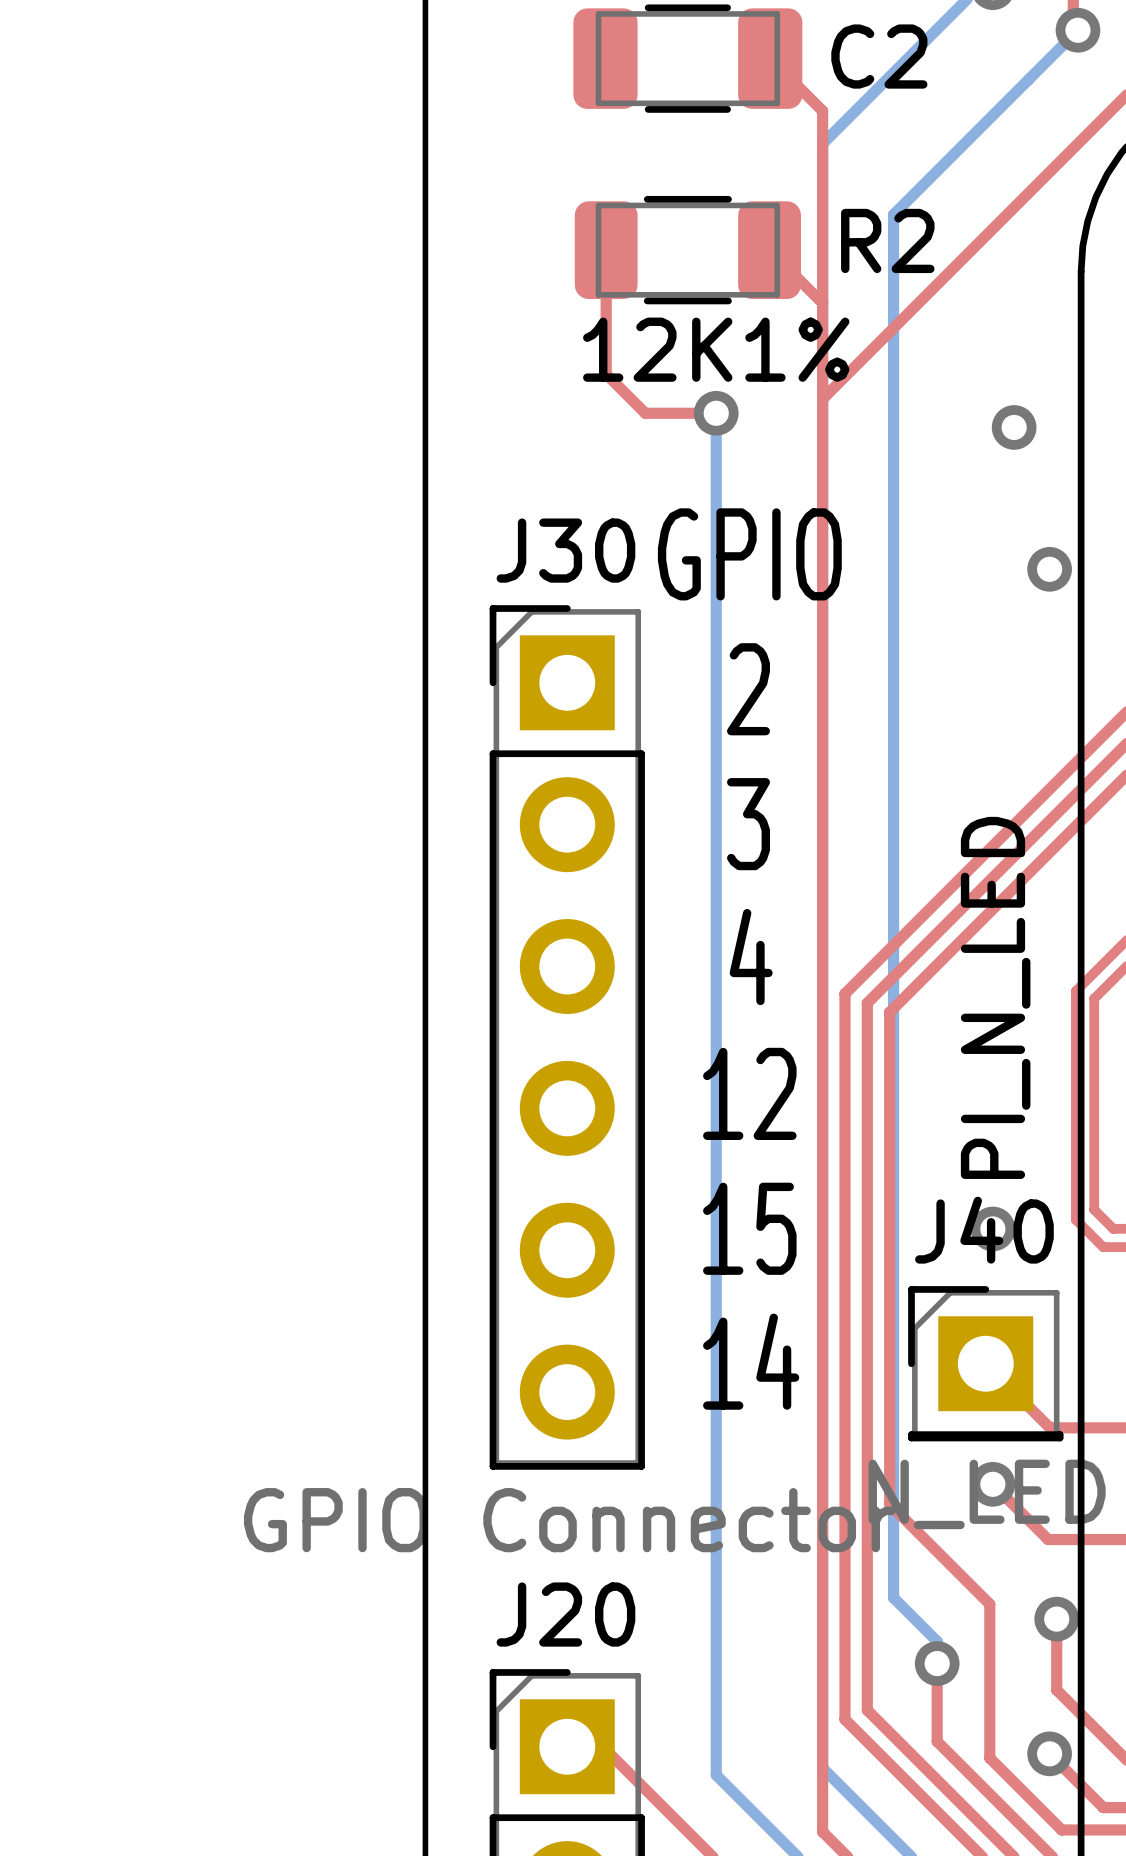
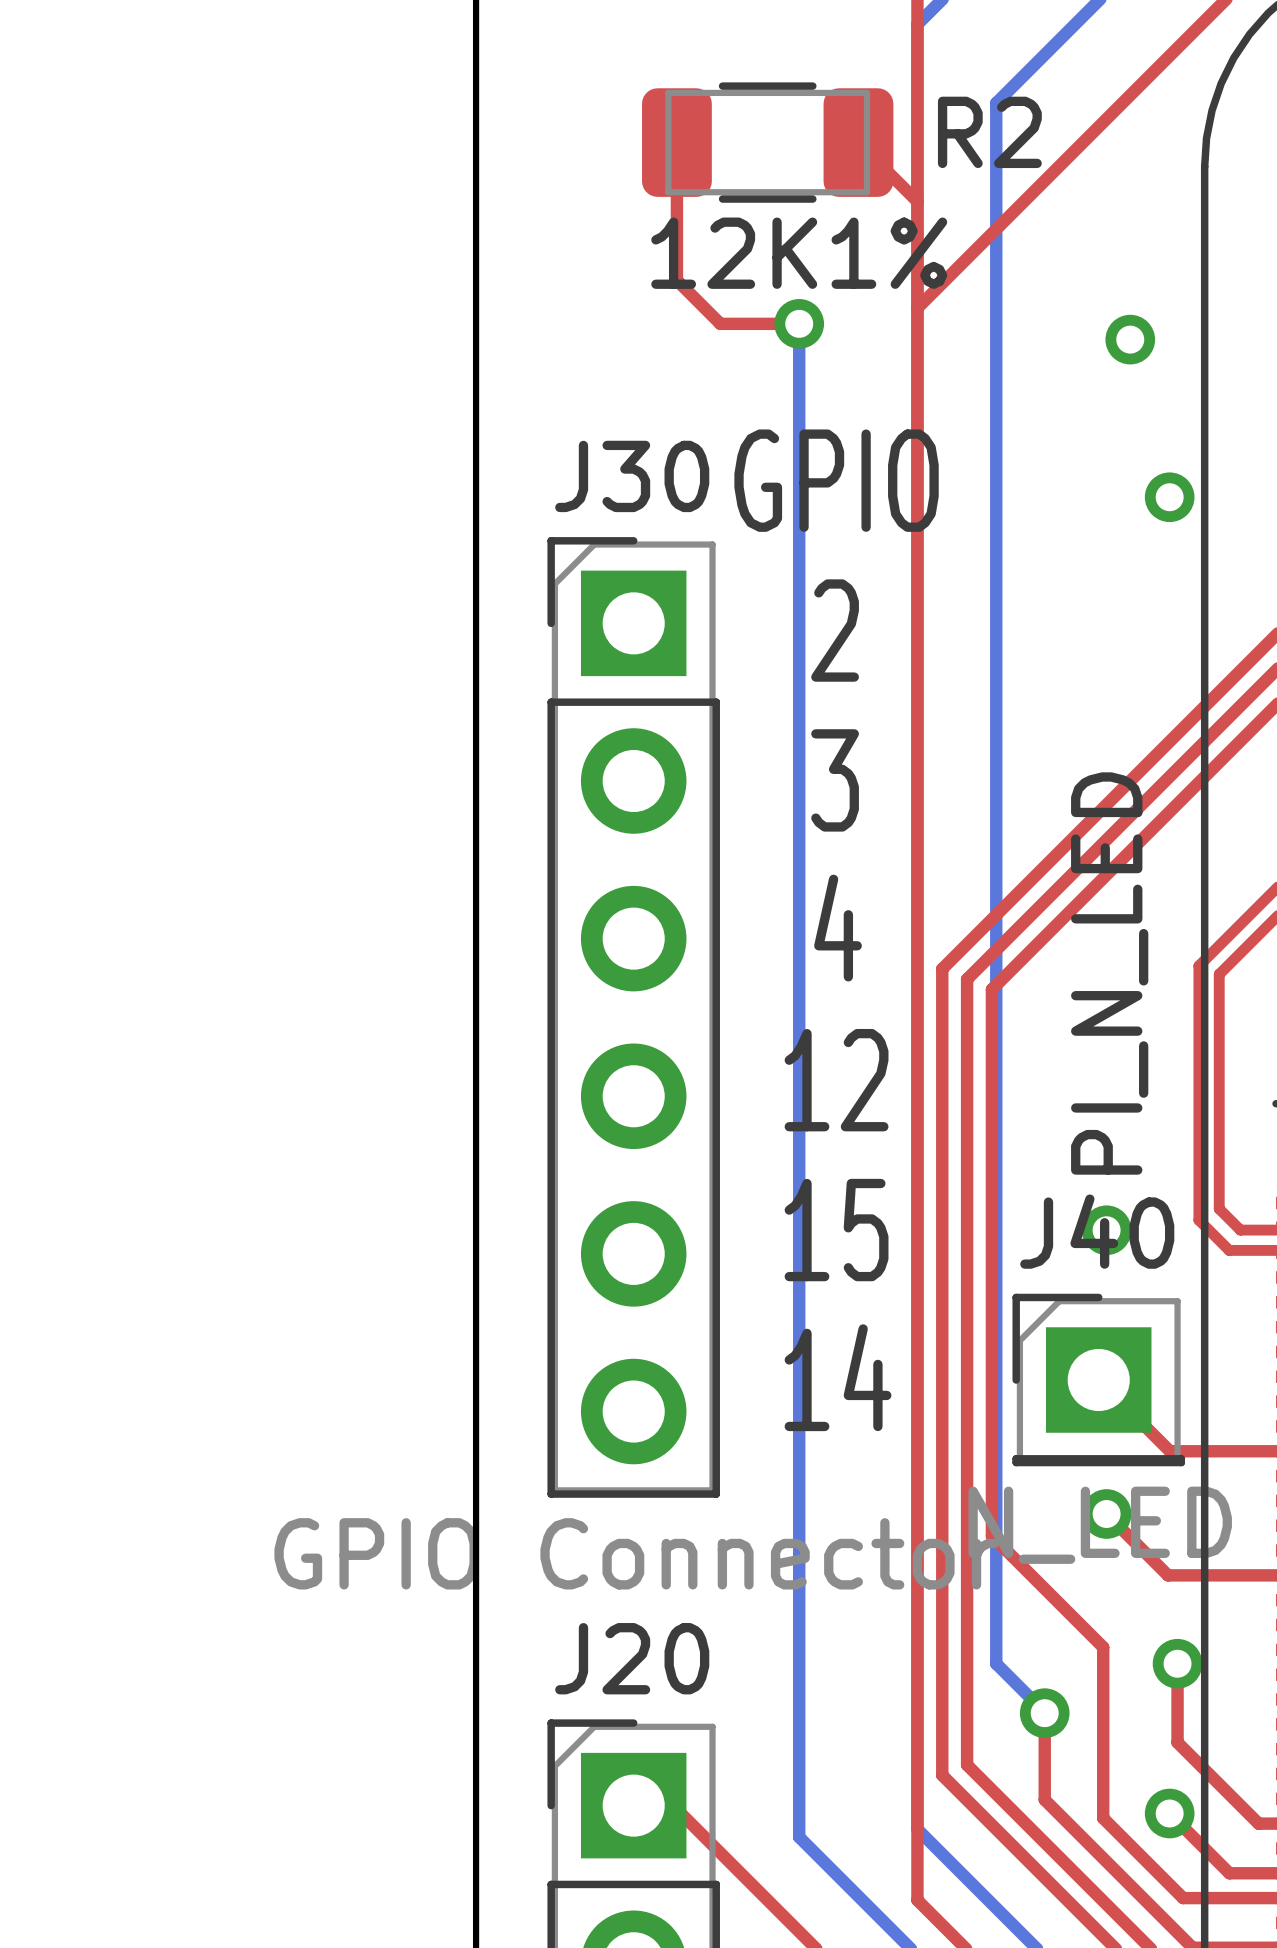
bottom track: (893, 1597) (937, 1641) (937, 1662) -> (996, 1640) (996, 1663) (1044, 1712)

